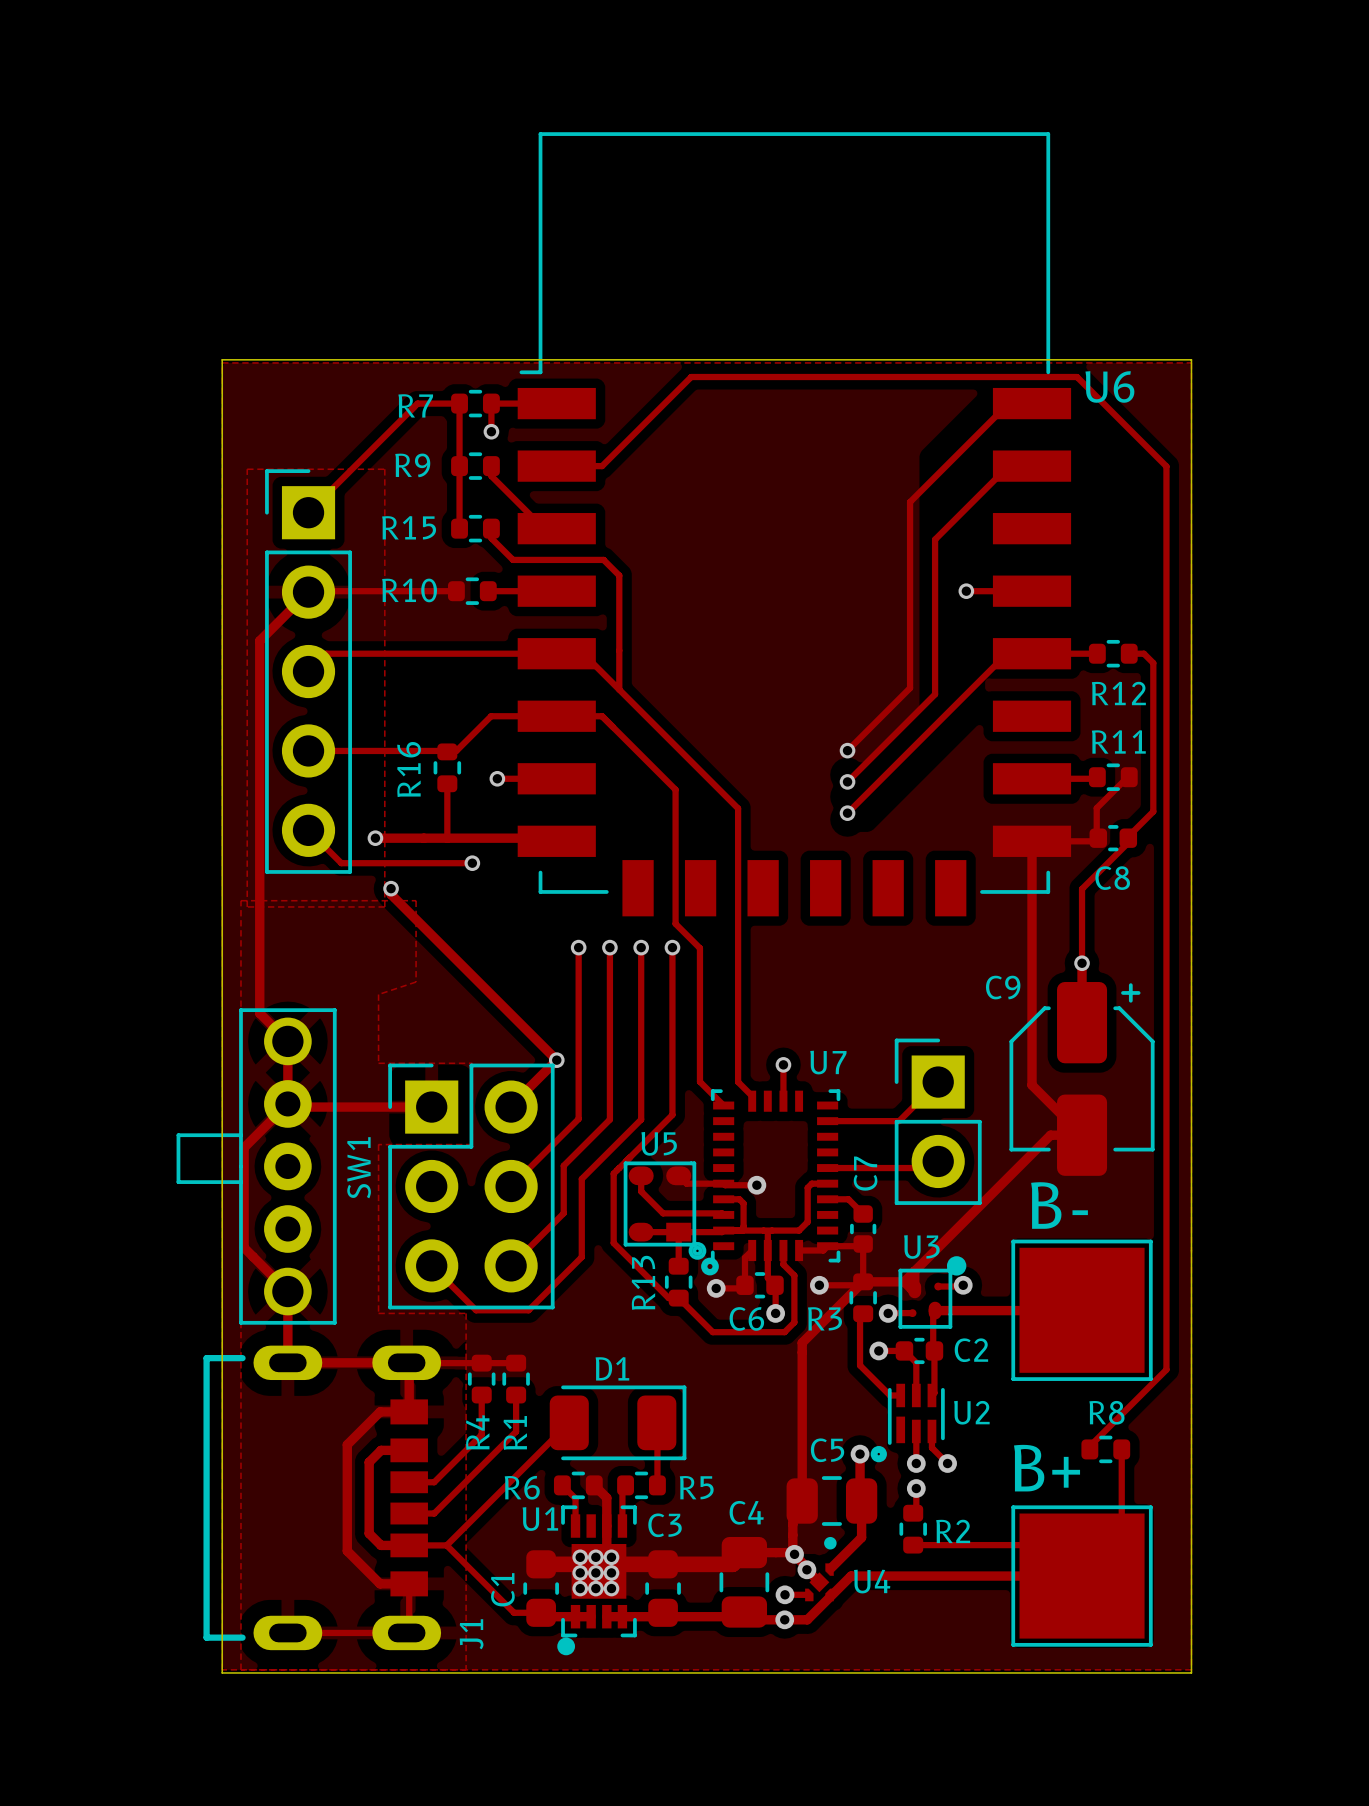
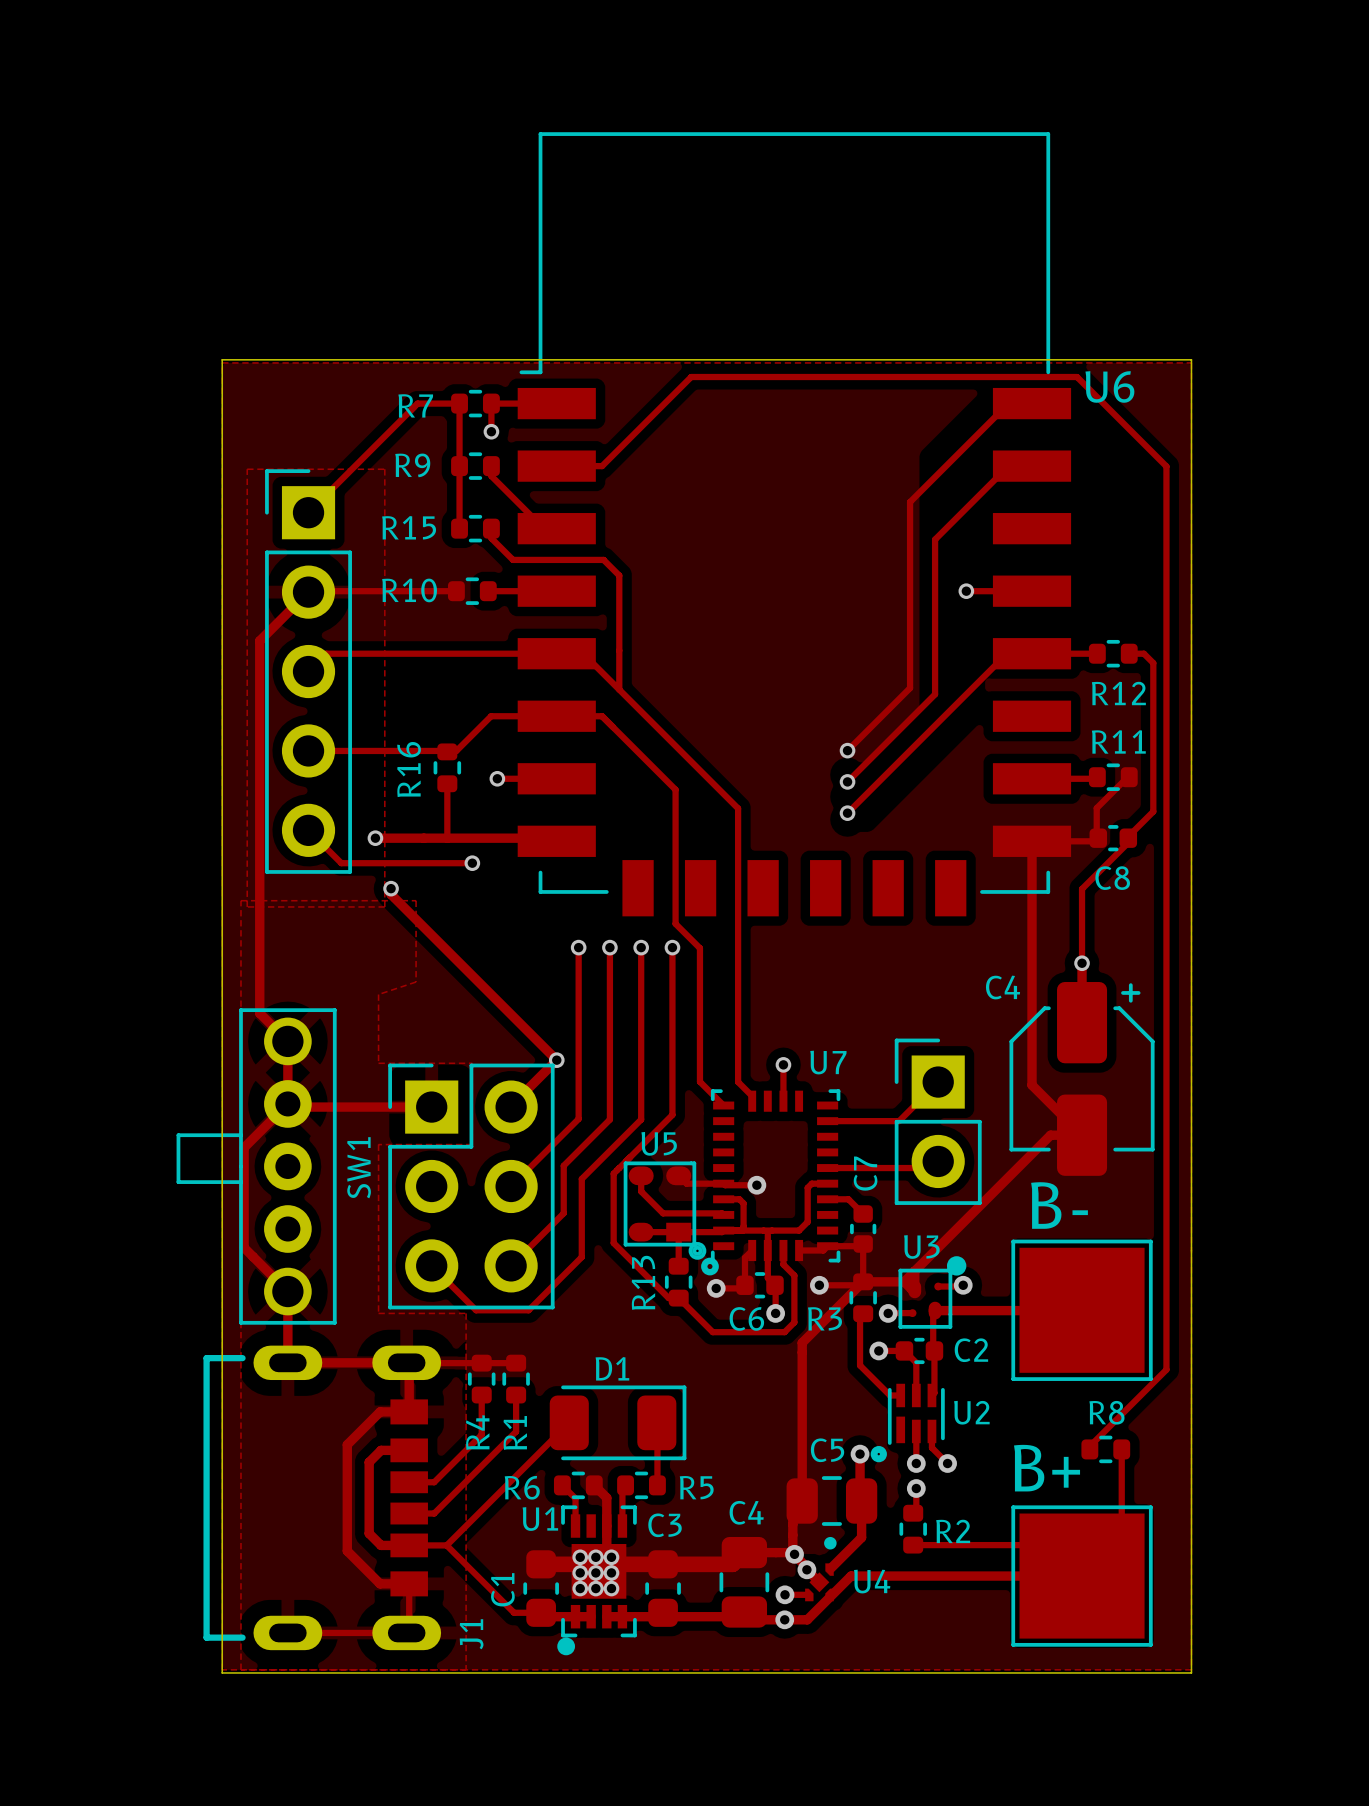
C9 name: C9 (1003, 987) -> C4 (1003, 987)

